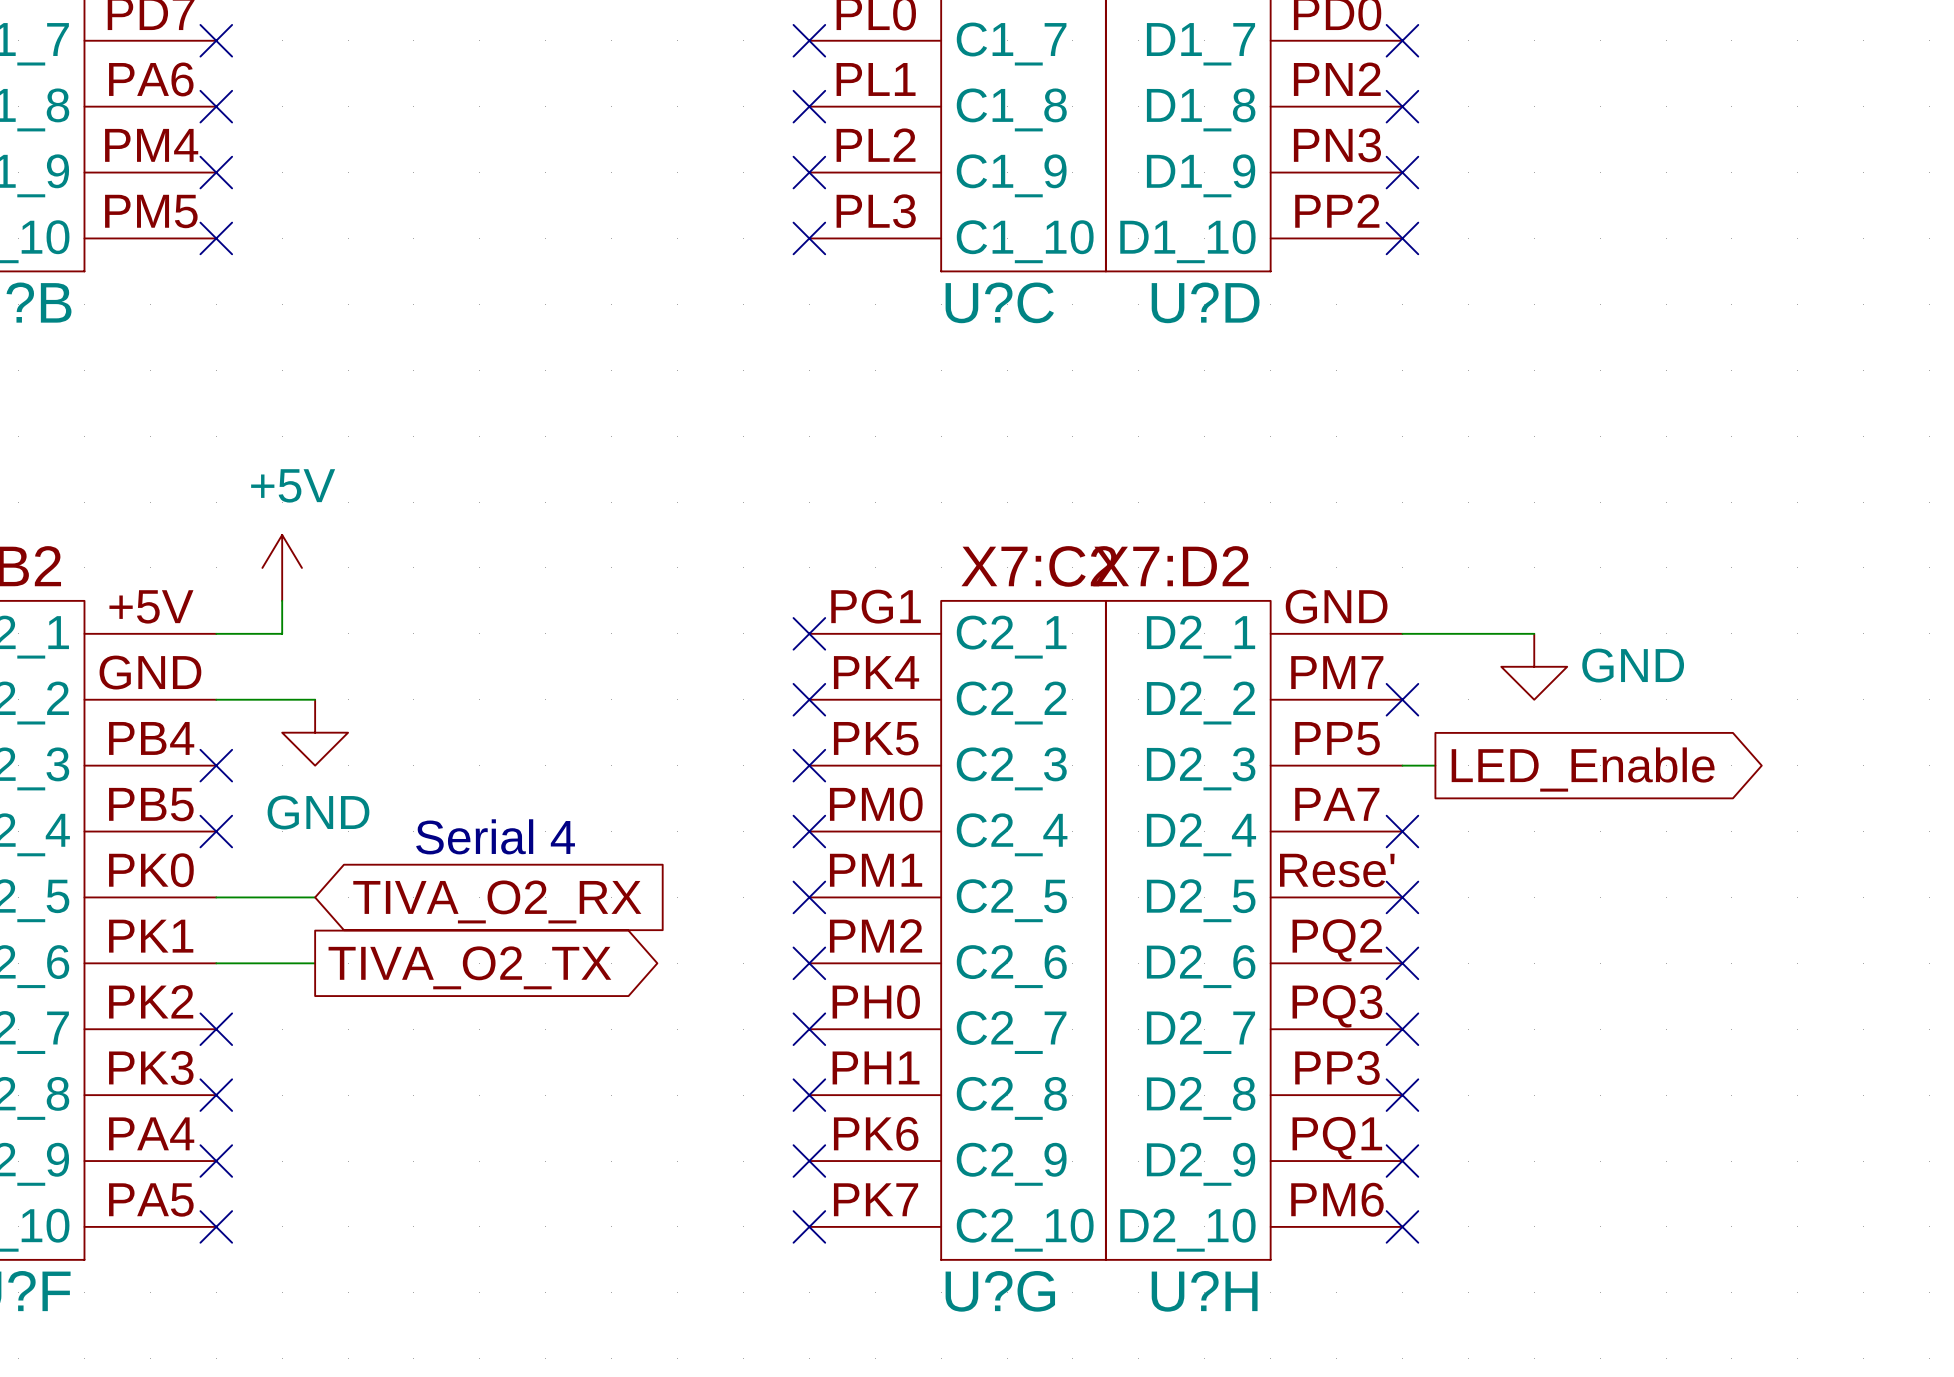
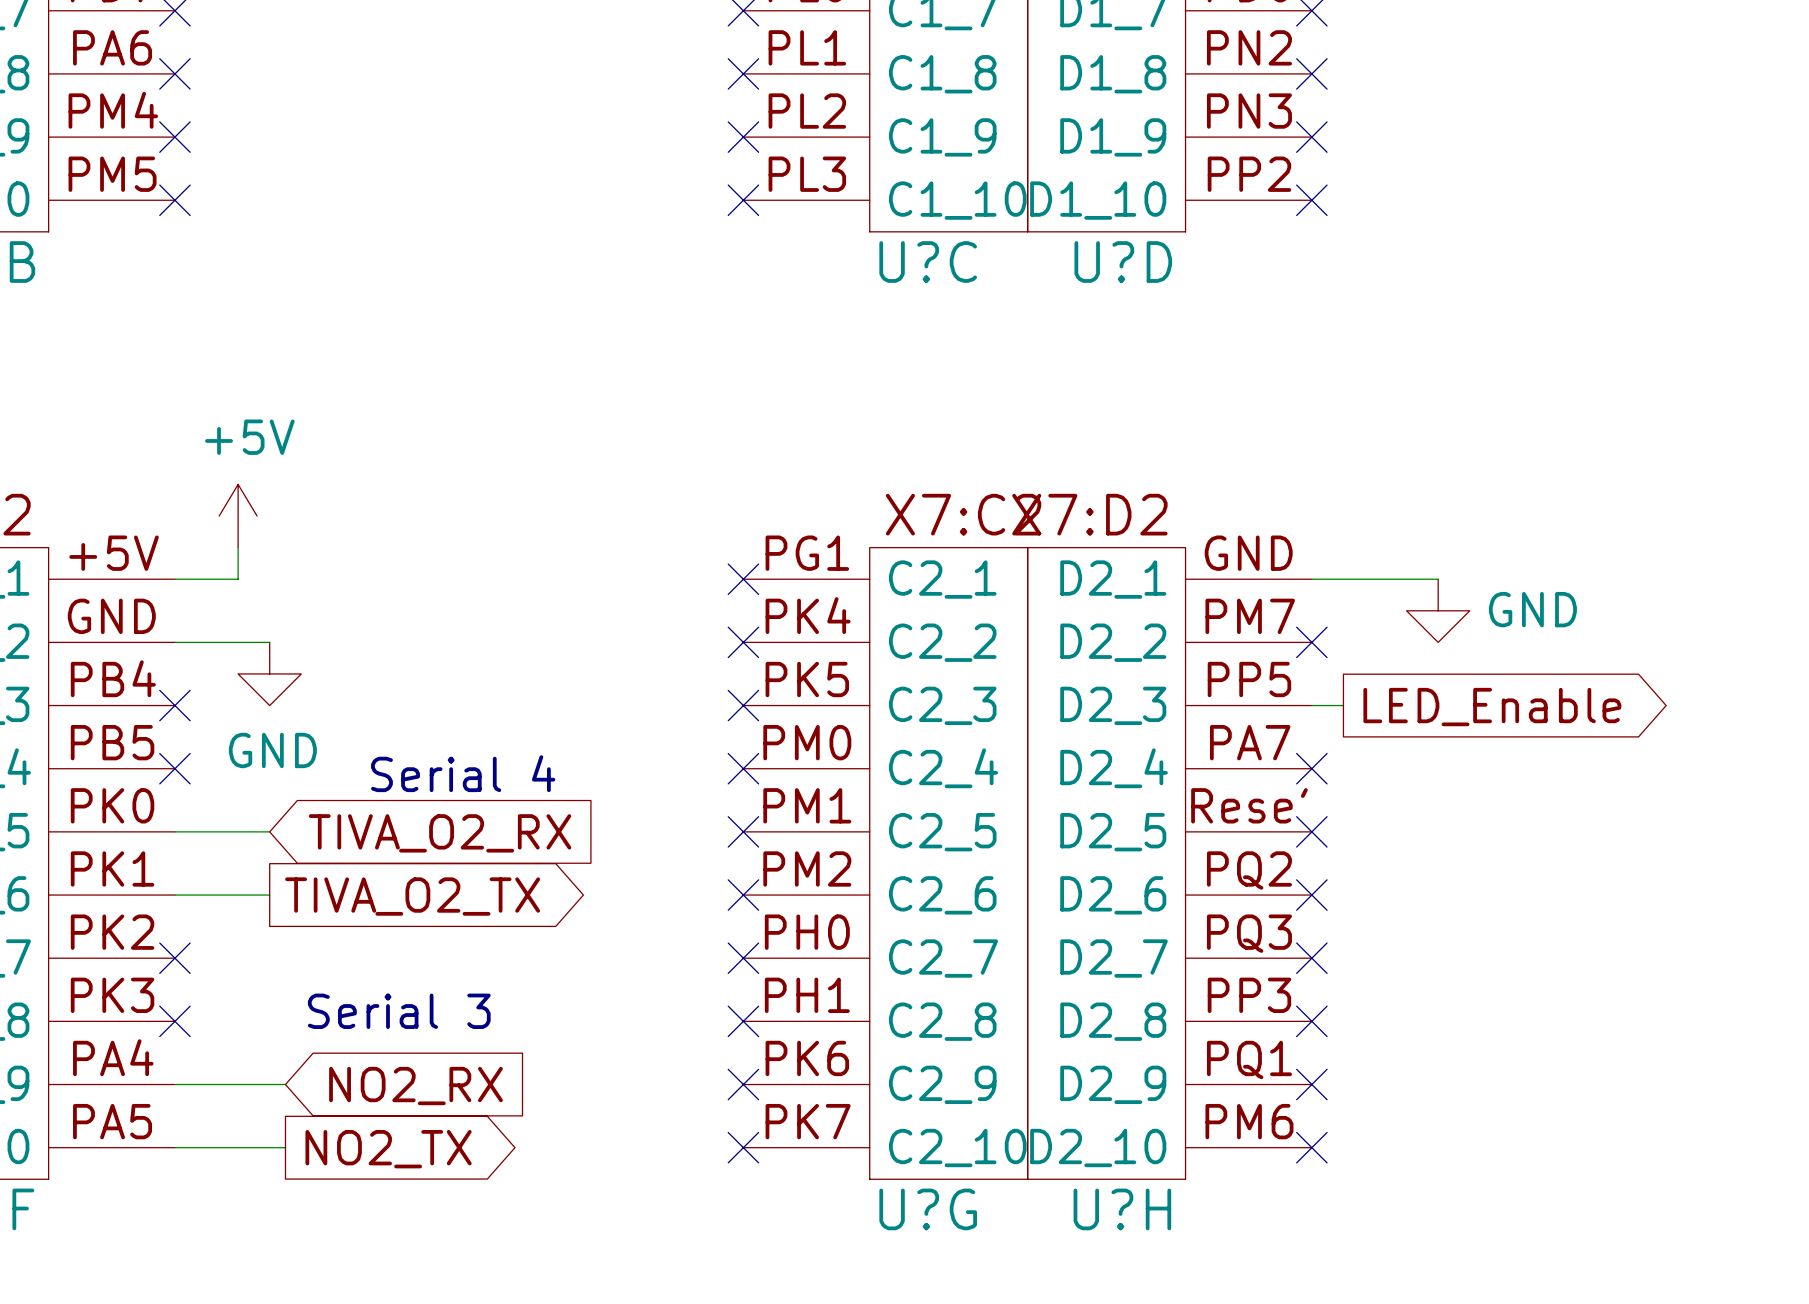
text: none -> Serial 3 (399, 1011)
wire: none -> (174, 1084) (285, 1084)
no-connect mark: (216, 1161) -> none
global label: none -> NO2_RX (415, 1086)
wire: none -> (174, 1147) (285, 1147)
no-connect mark: (216, 1226) -> none
global label: none -> NO2_TX (388, 1149)

